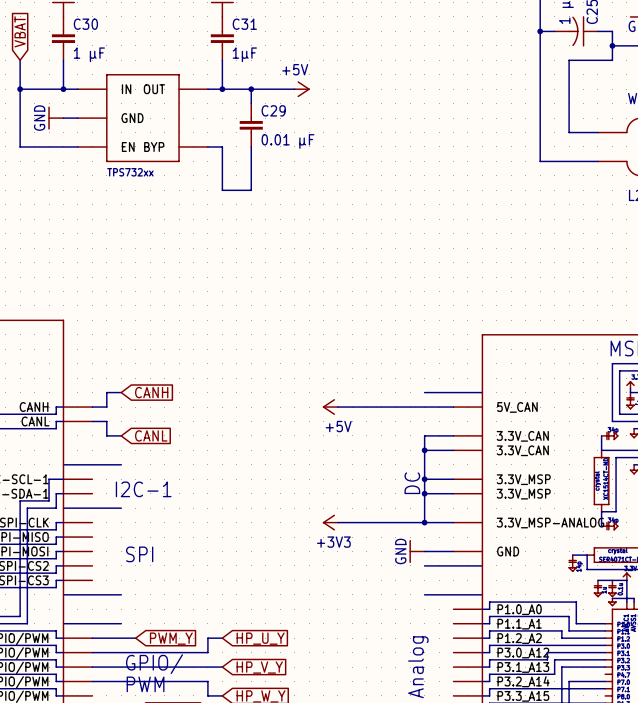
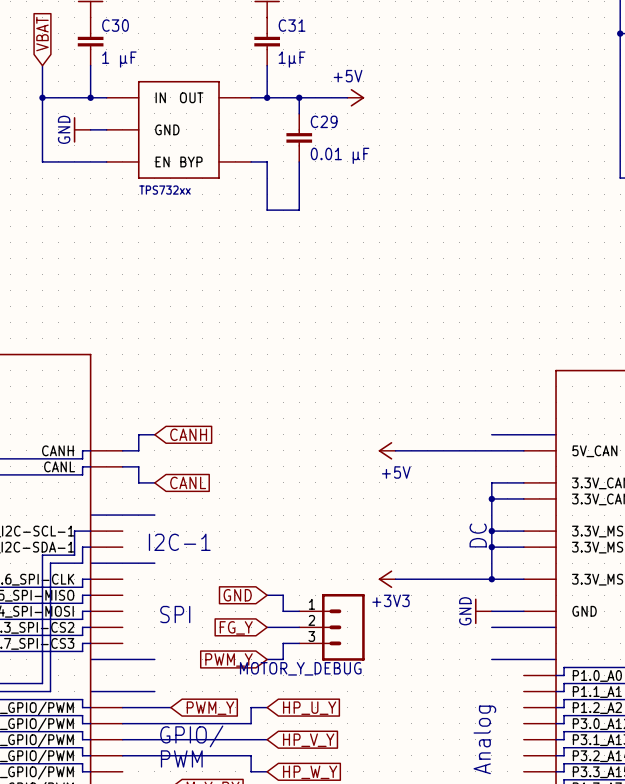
global label: none -> GND (237, 595)
wire: none -> (267, 595) (283, 595) (283, 611) (299, 611)
wire: none -> (267, 627) (299, 627)
MOTOR_Y_DEBUG: none -> (331, 627)
global label: none -> FG_Y (236, 627)
wire: none -> (299, 643) (283, 643) (283, 659) (267, 659)
global label: none -> PWM_Y (229, 659)

